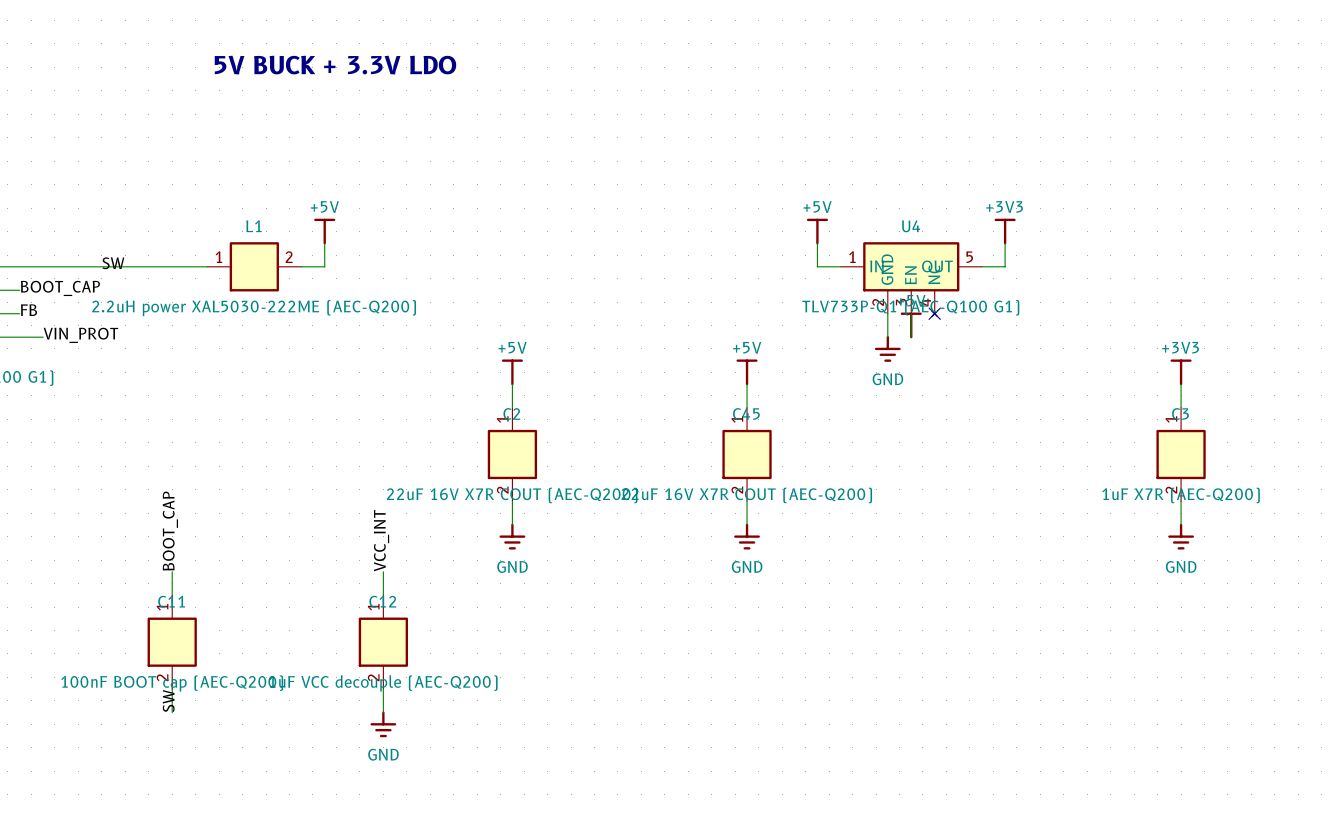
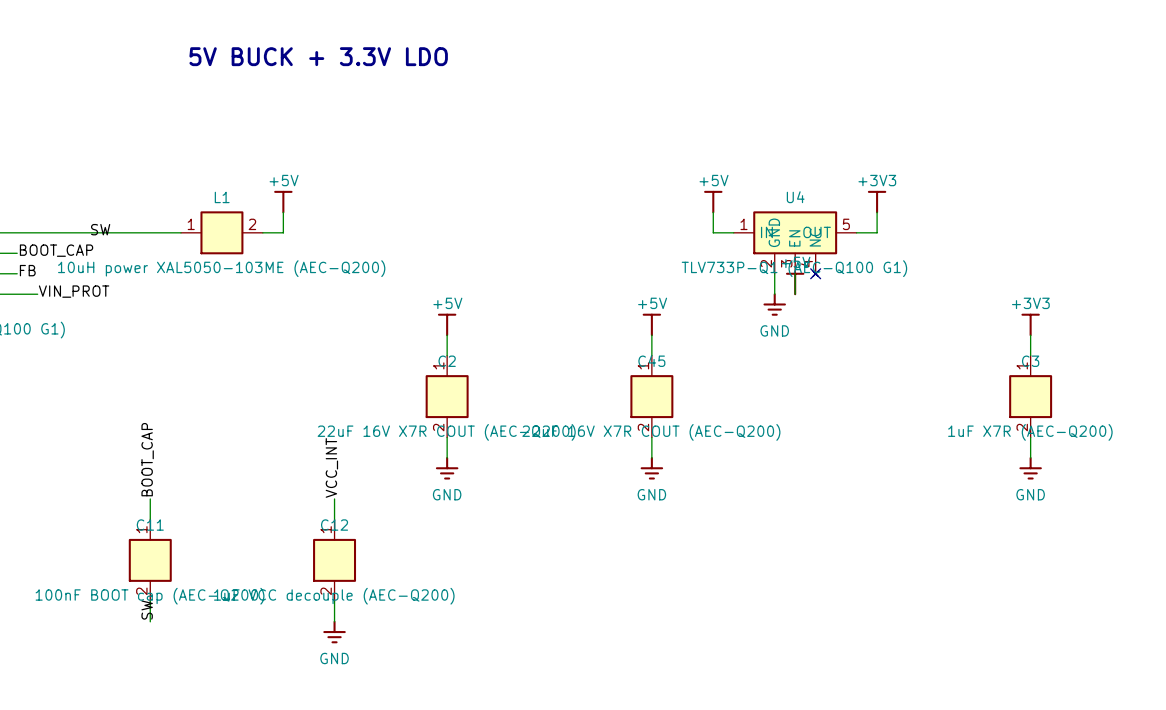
L1 value: 2.2uH power XAL5030-222ME (AEC-Q200) (254, 308) -> 10uH power XAL5050-103ME (AEC-Q200) (221, 268)

